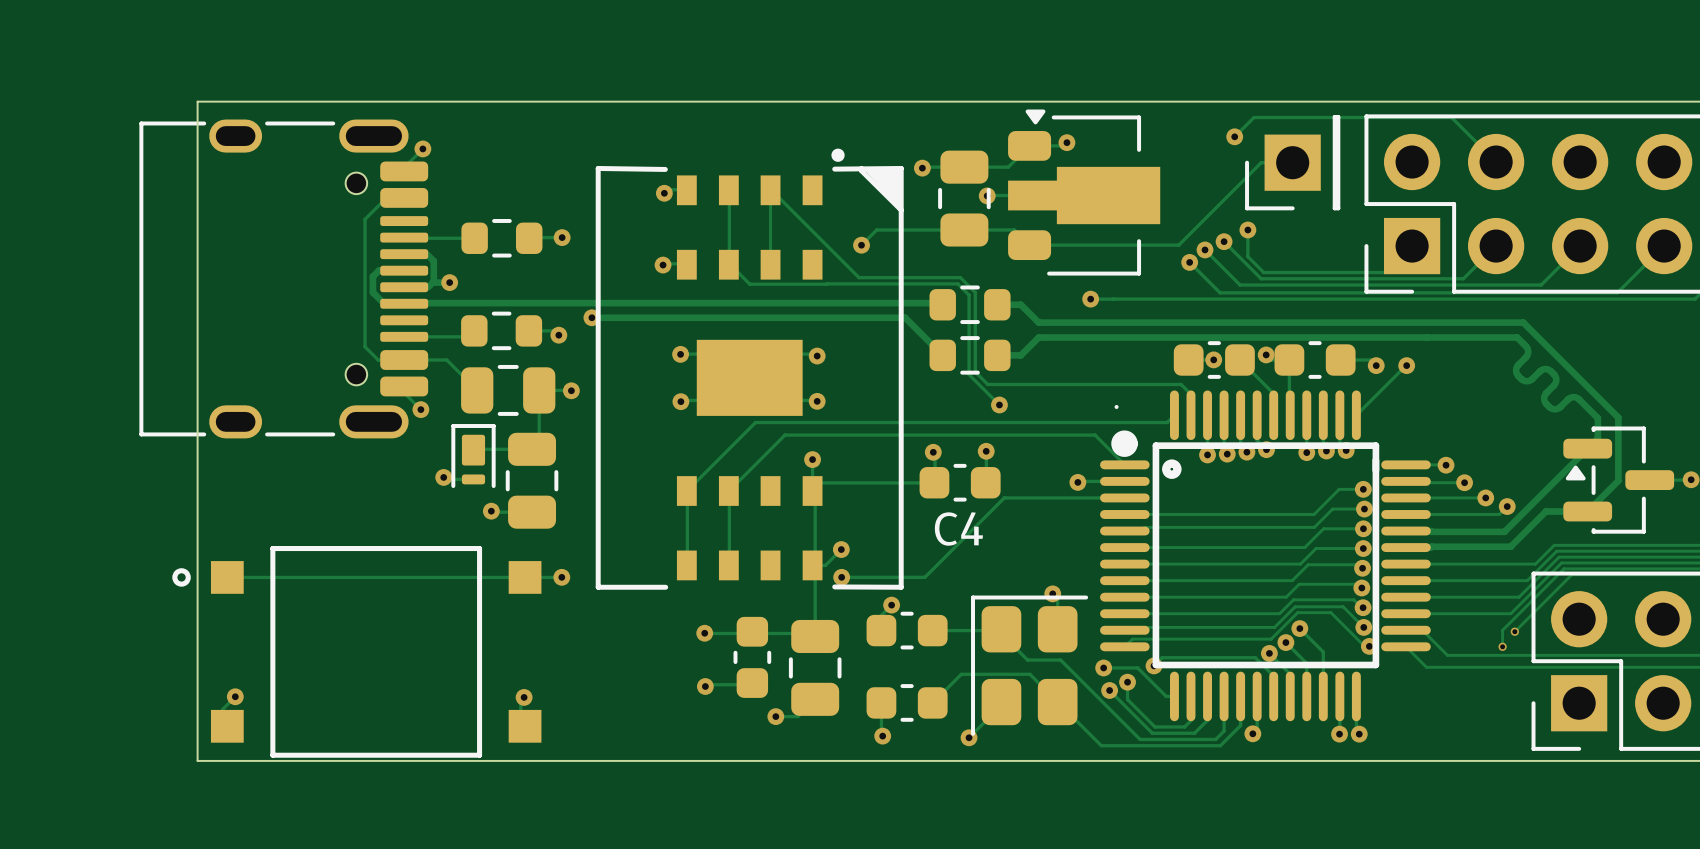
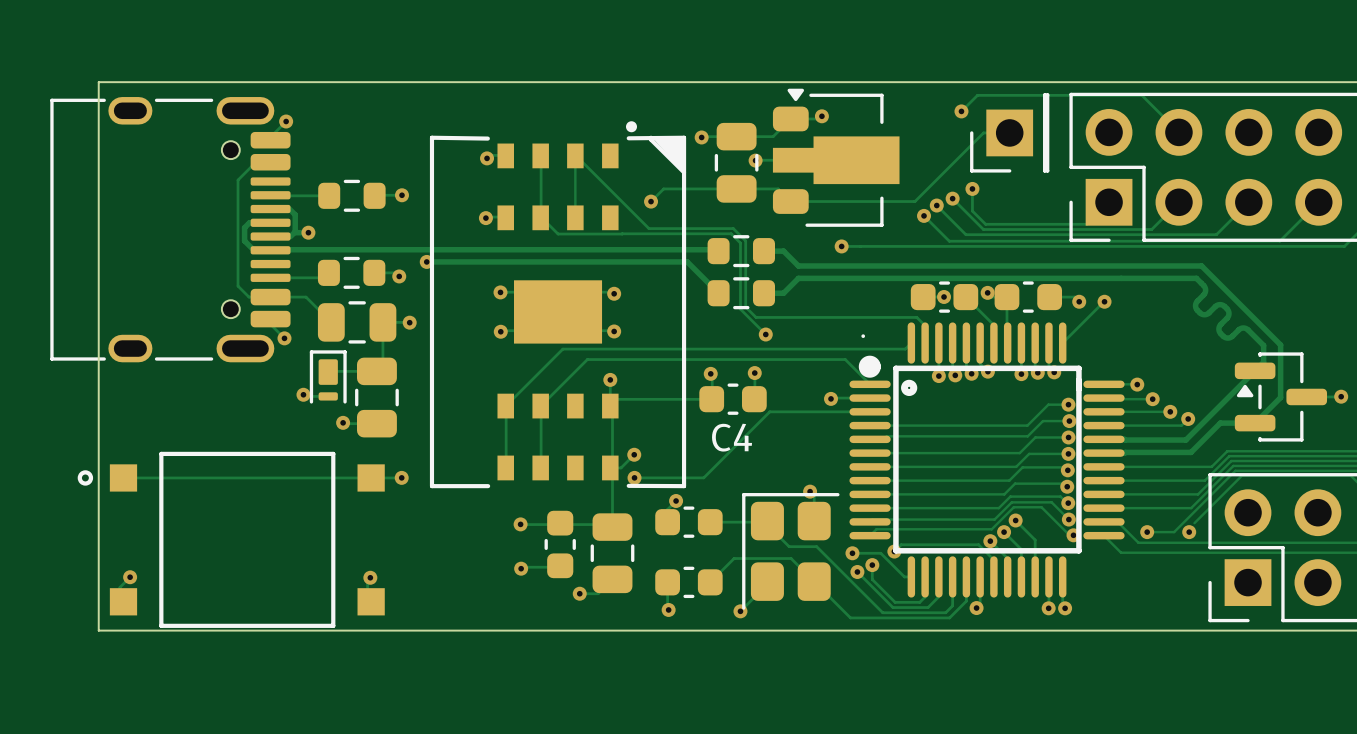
track: (1502, 630) (1502, 646) -> (1184, 521) (1174, 532) (1147, 532)
via: (1514, 631) -> none
via: none -> (1147, 532)
via: none -> (1189, 532)
via: (1502, 646) -> none

